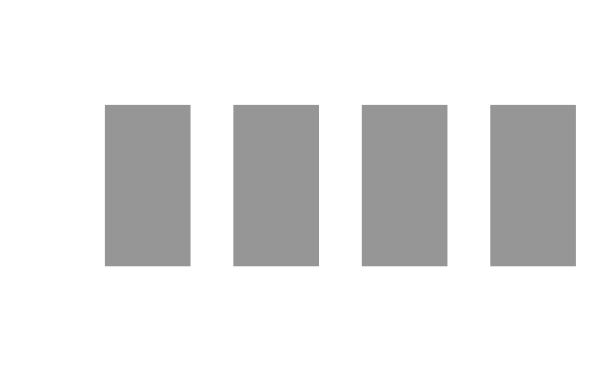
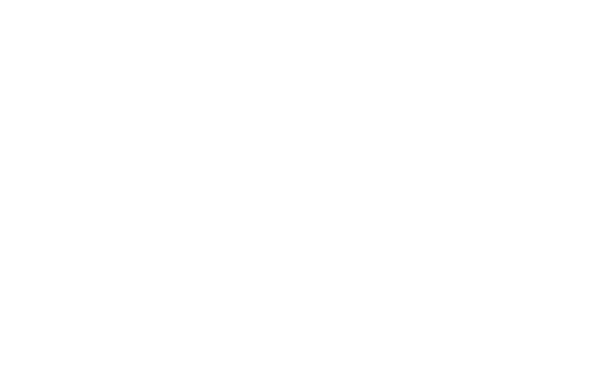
part: (340, 185) -> none

